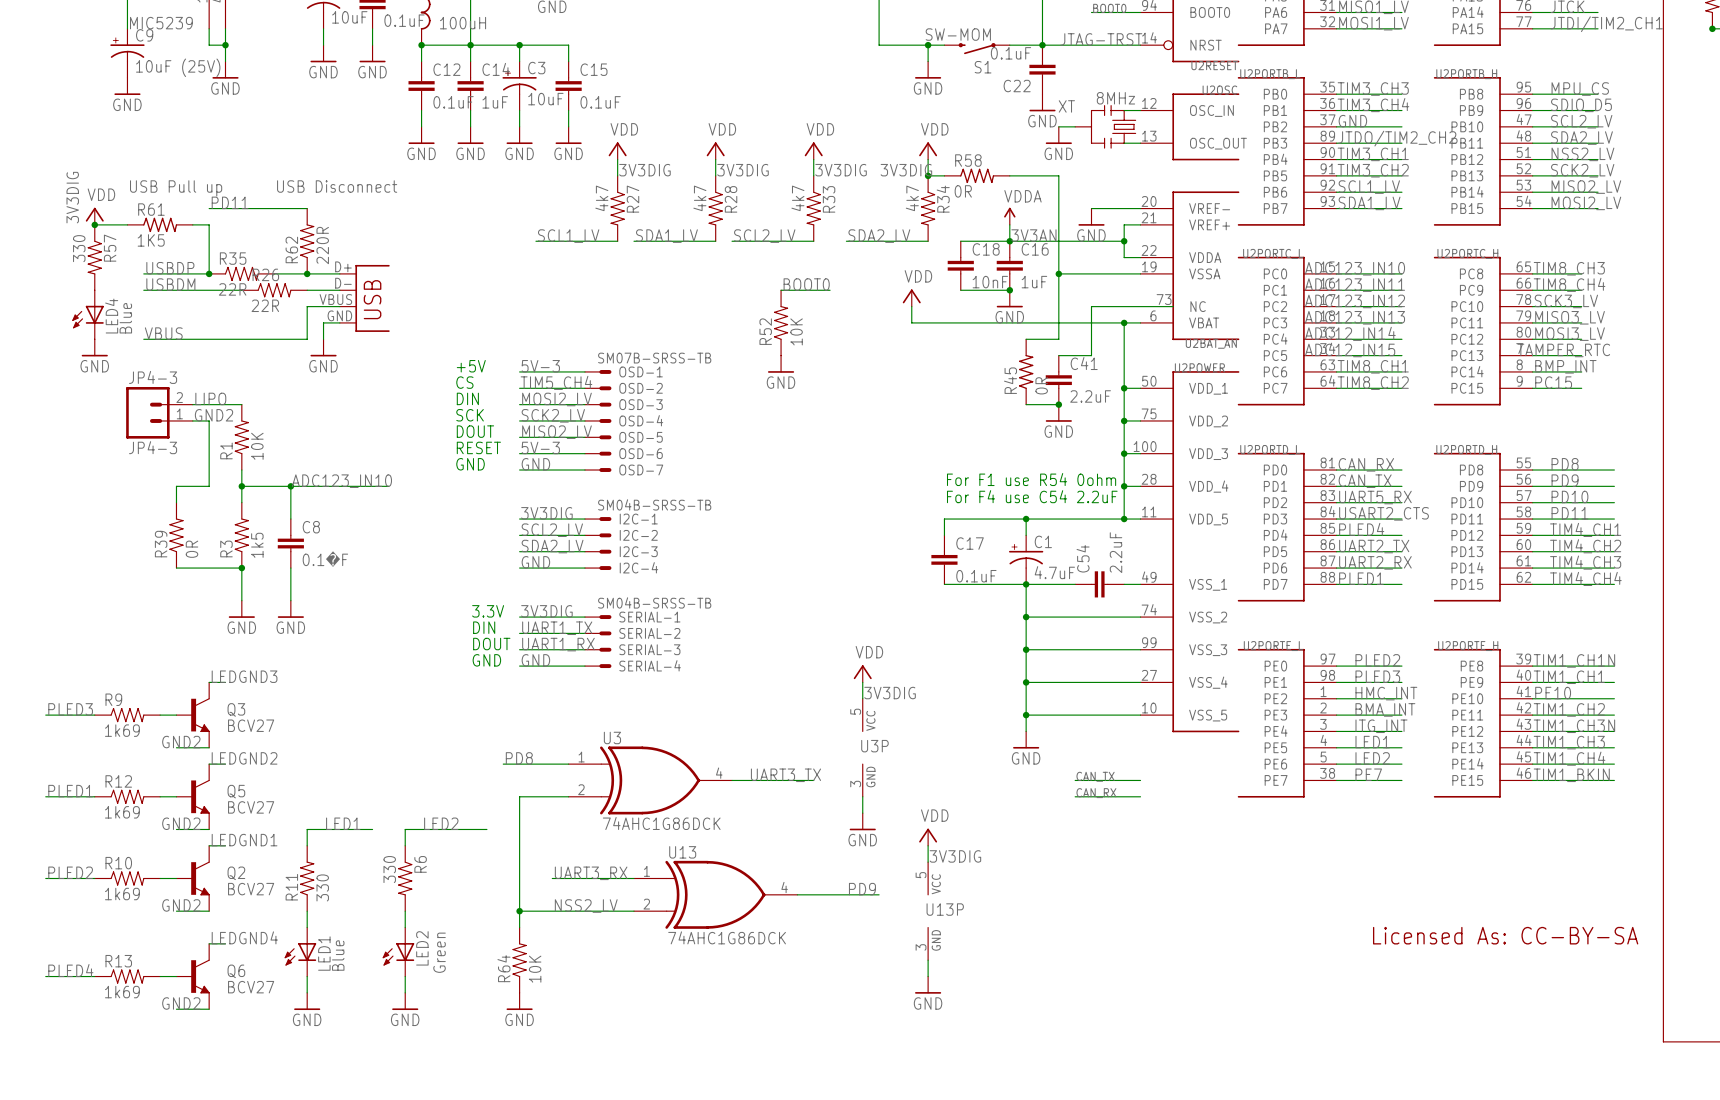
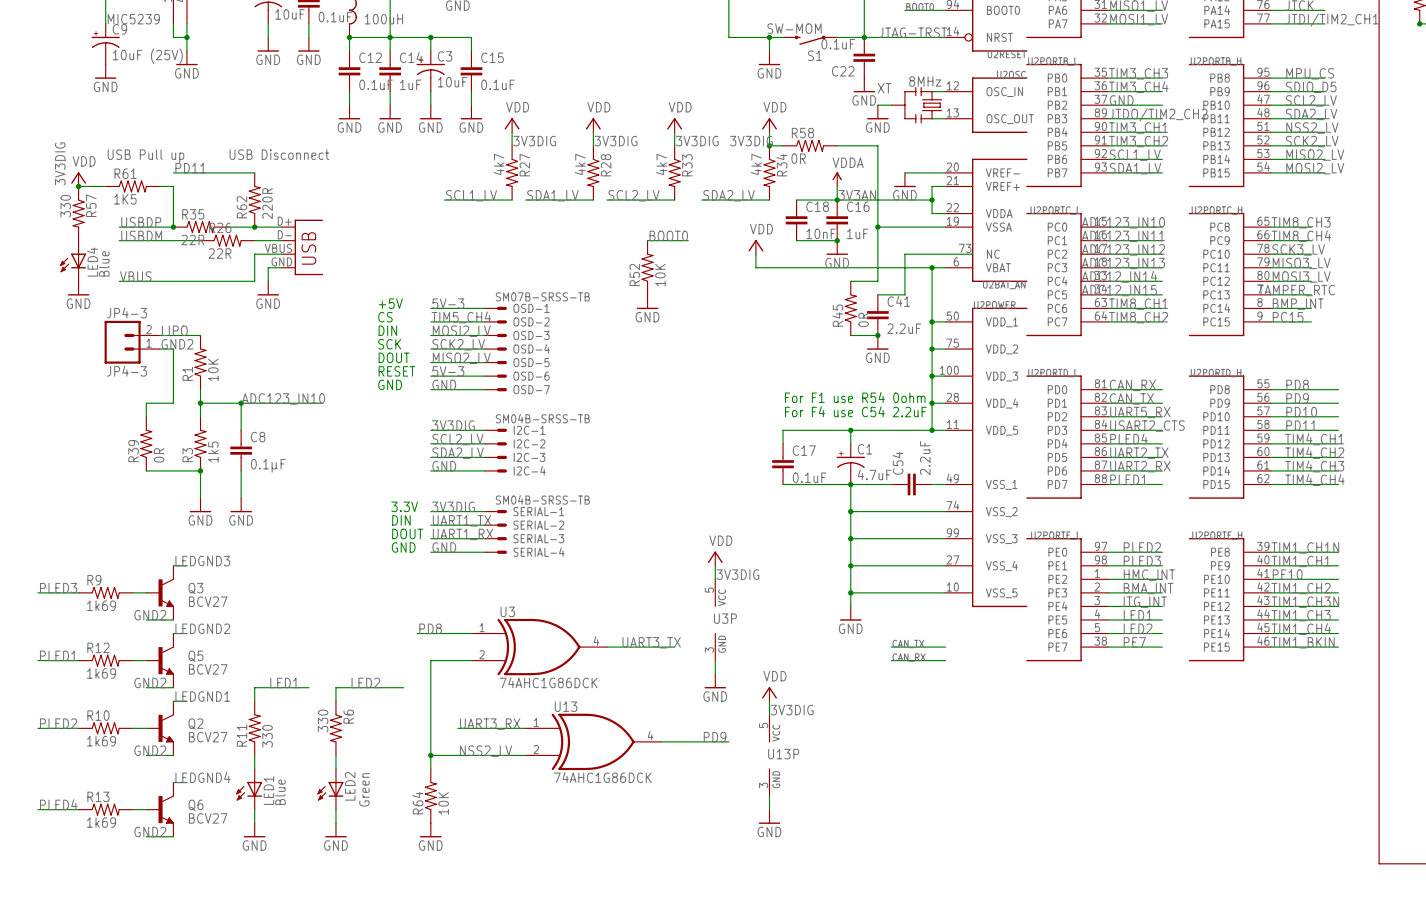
C8 value: 0.1�F (325, 559) -> 0.1µF (268, 465)
text: Licensed As: CC-BY-SA (1505, 935) -> none

